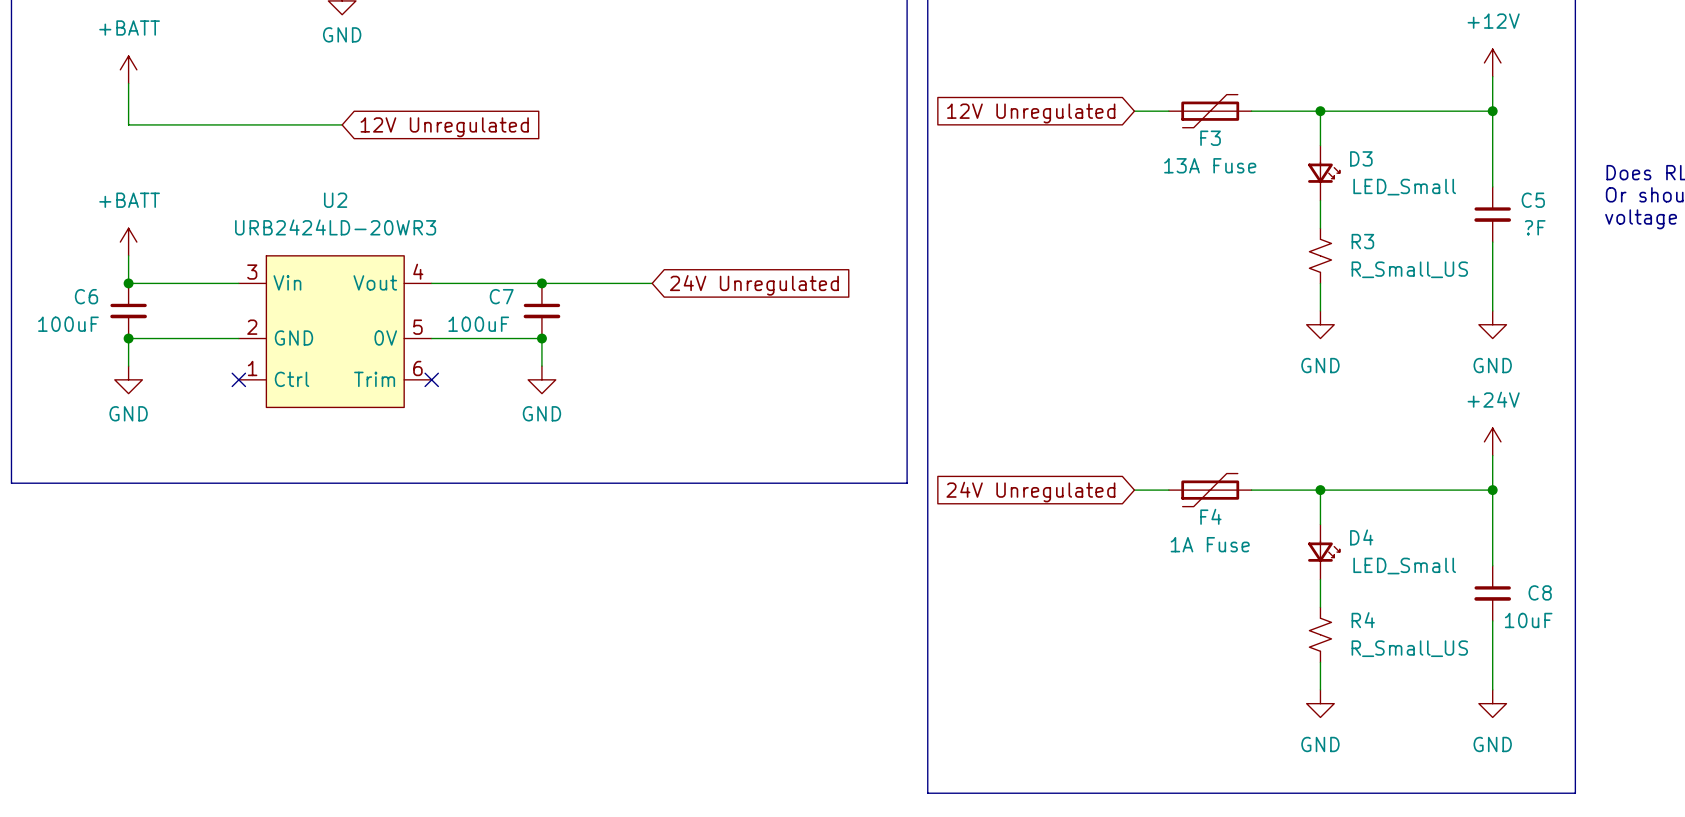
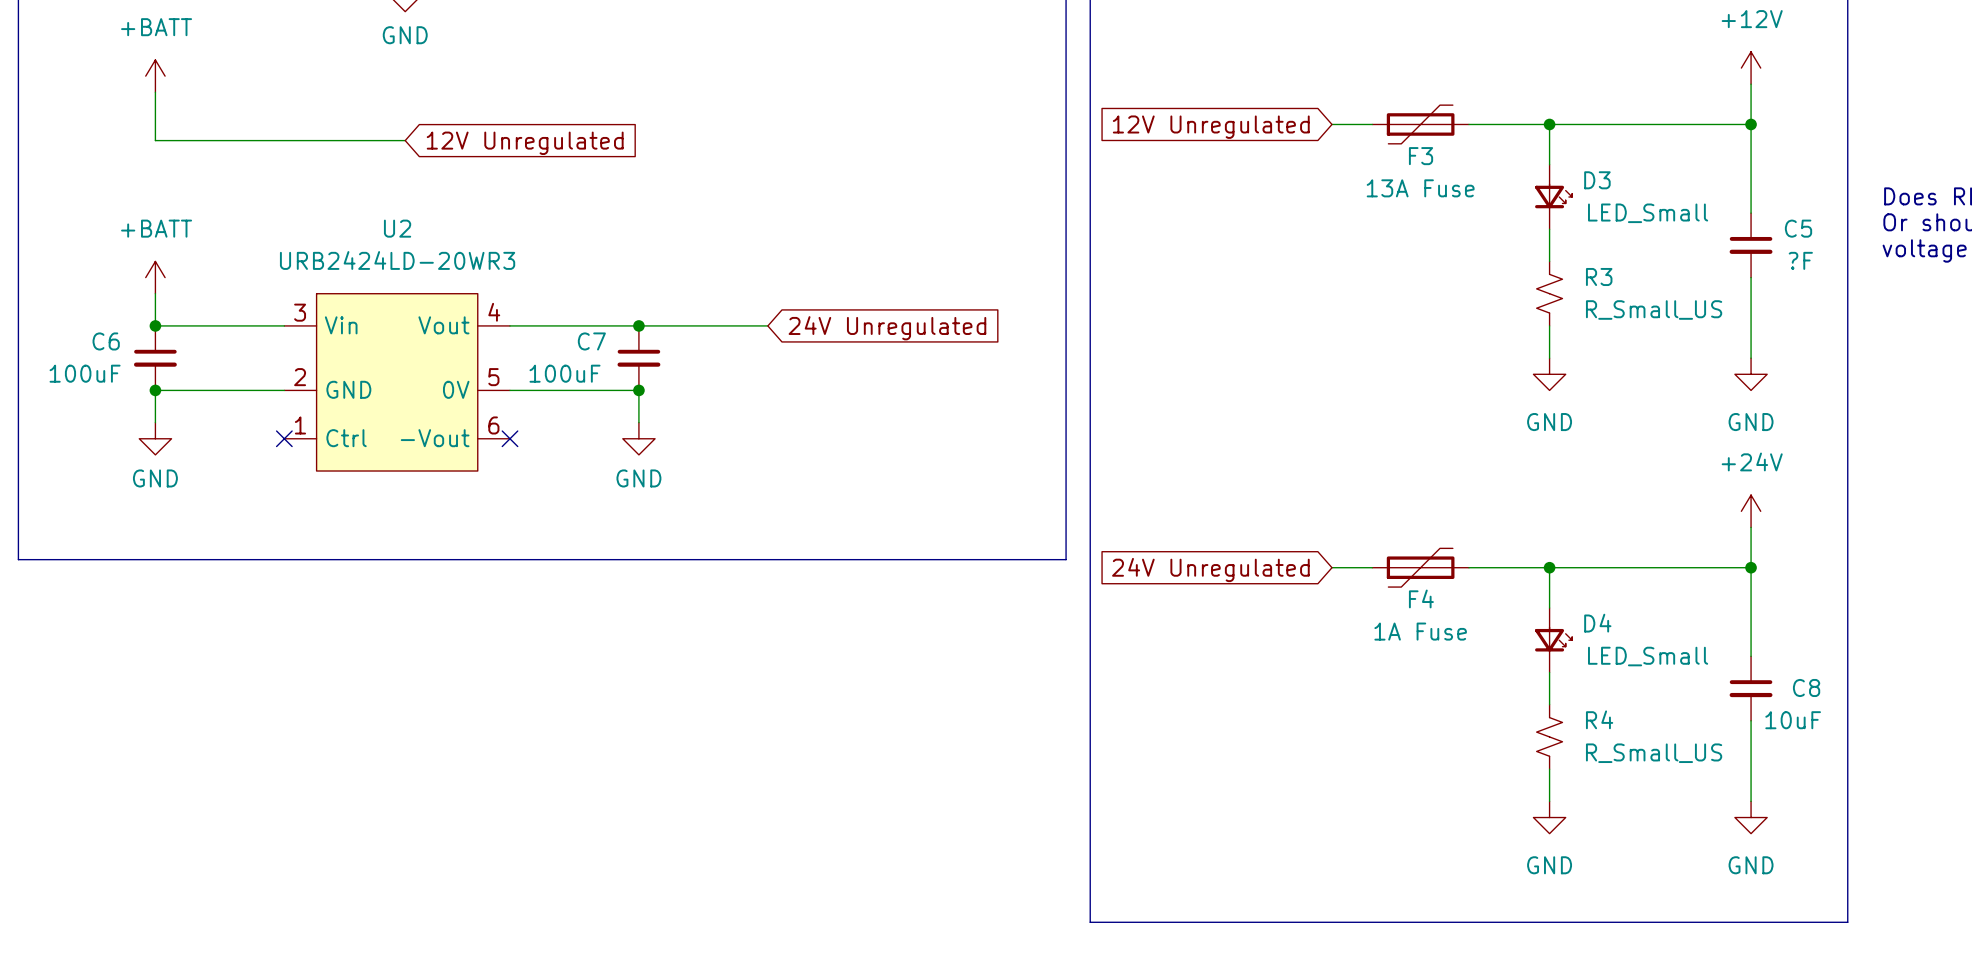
U2 pin name: Trim (374, 379) -> -Vout (435, 438)

